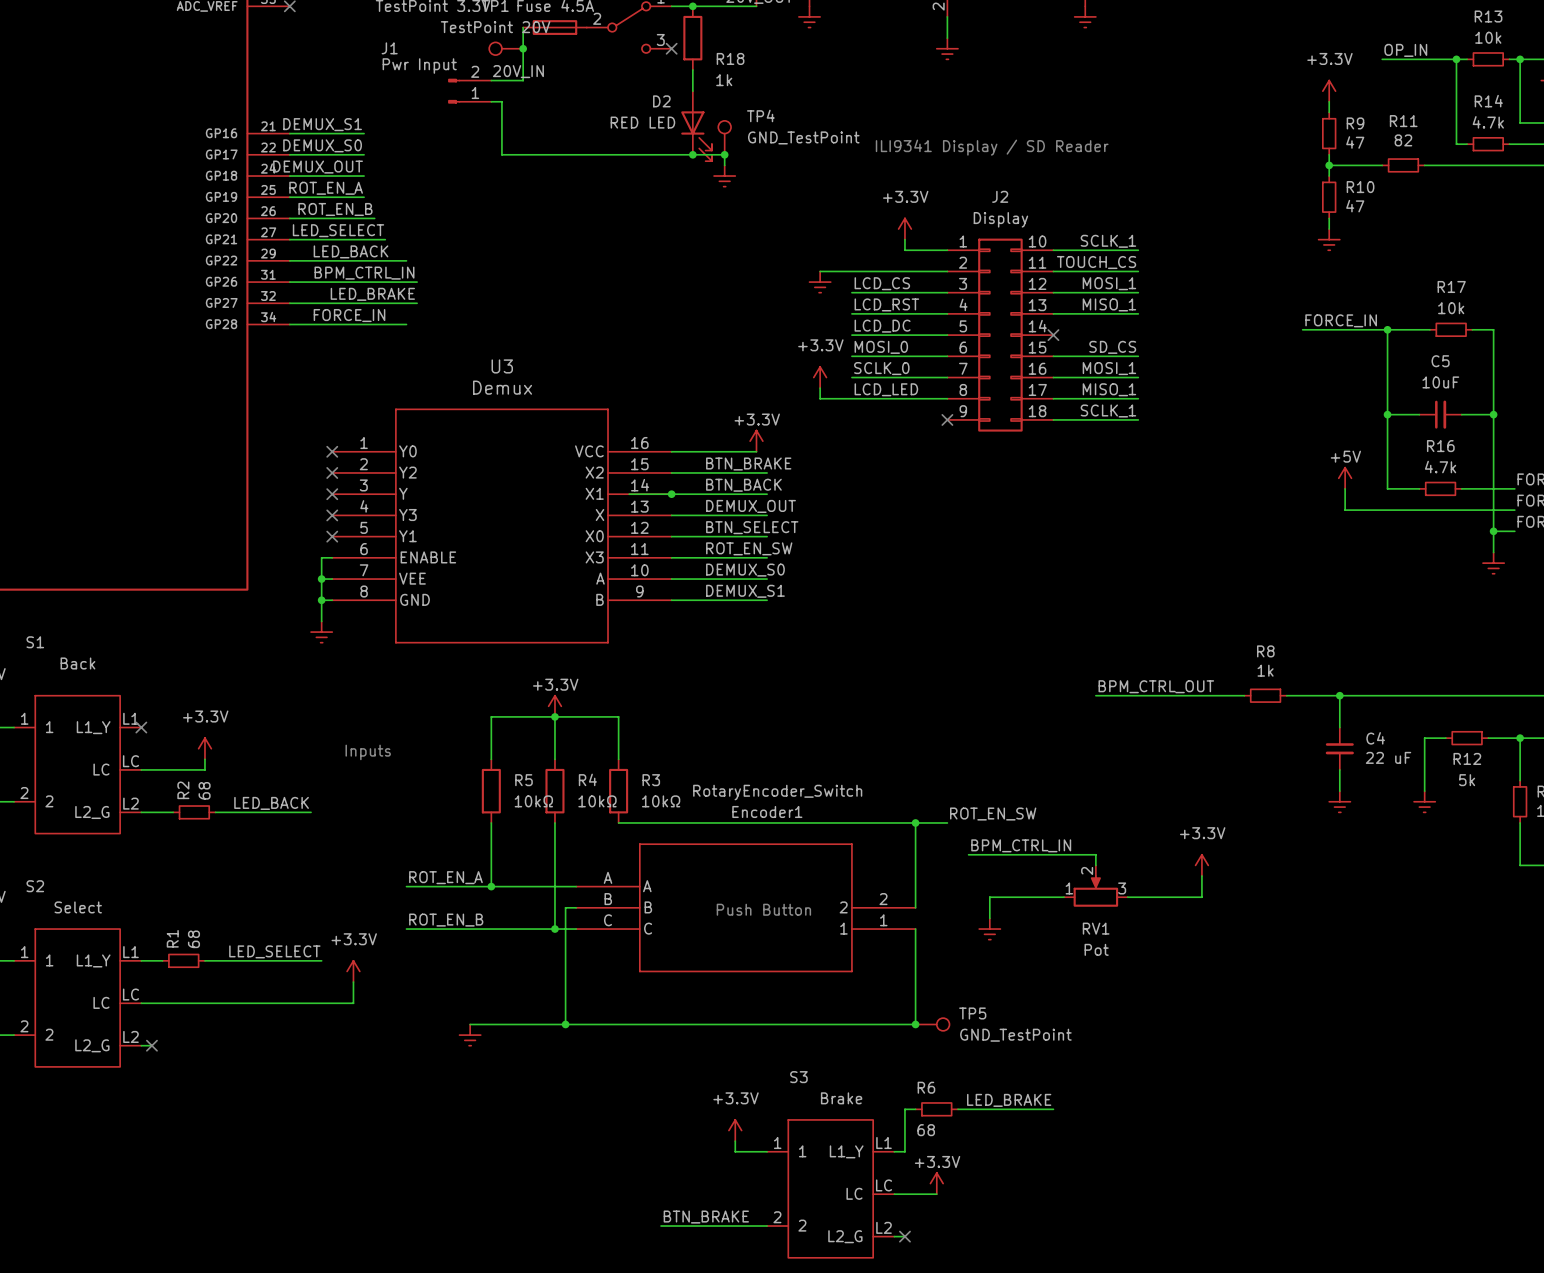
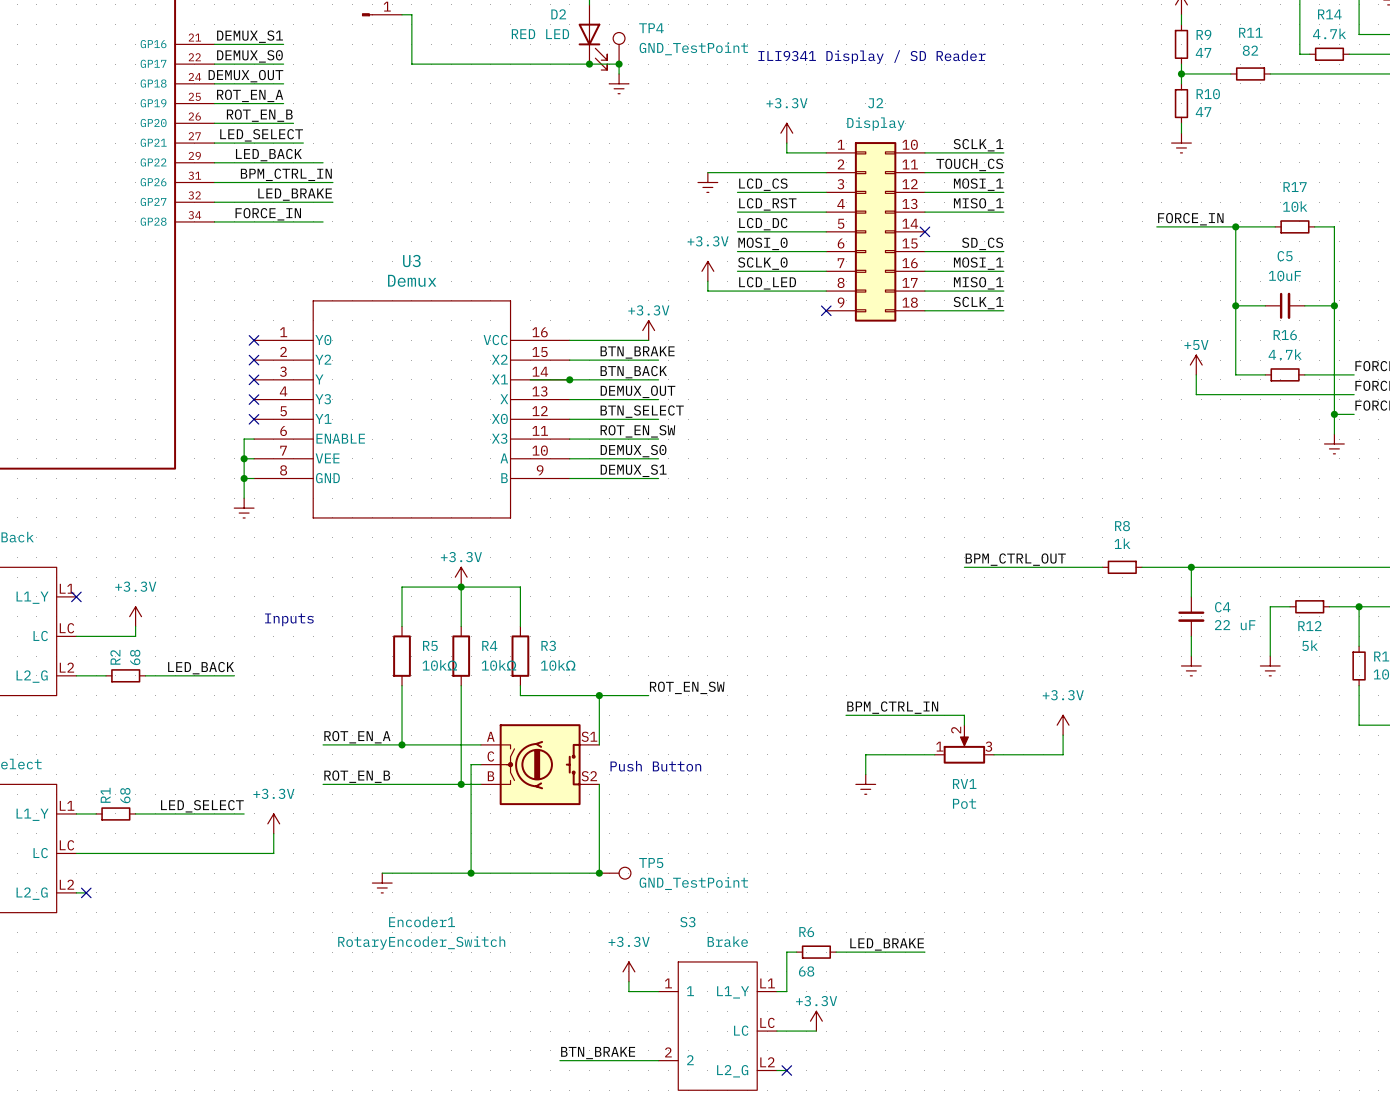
Encoder1 value position: RotaryEncoder_Switch (777, 792) -> RotaryEncoder_Switch (421, 942)
Encoder1 name position: Encoder1 (767, 811) -> Encoder1 (422, 921)
label position: ROT_EN_SW (993, 814) -> ROT_EN_SW (687, 687)
wire: (618, 822) (947, 822) -> (520, 685) (520, 695) (648, 695)
wire: (915, 822) (915, 907) -> none
junction: (915, 822) -> none
wire: none -> (599, 695) (599, 744)
junction: none -> (599, 695)
Encoder1 symbol: [576, 843, 916, 972] -> [480, 724, 600, 806]
wire: (915, 929) (915, 1024) (703, 1024) -> (599, 784) (599, 873)
junction: none -> (599, 873)
junction: (915, 1024) -> none
TP5 position: (932, 1024) -> (615, 873)

